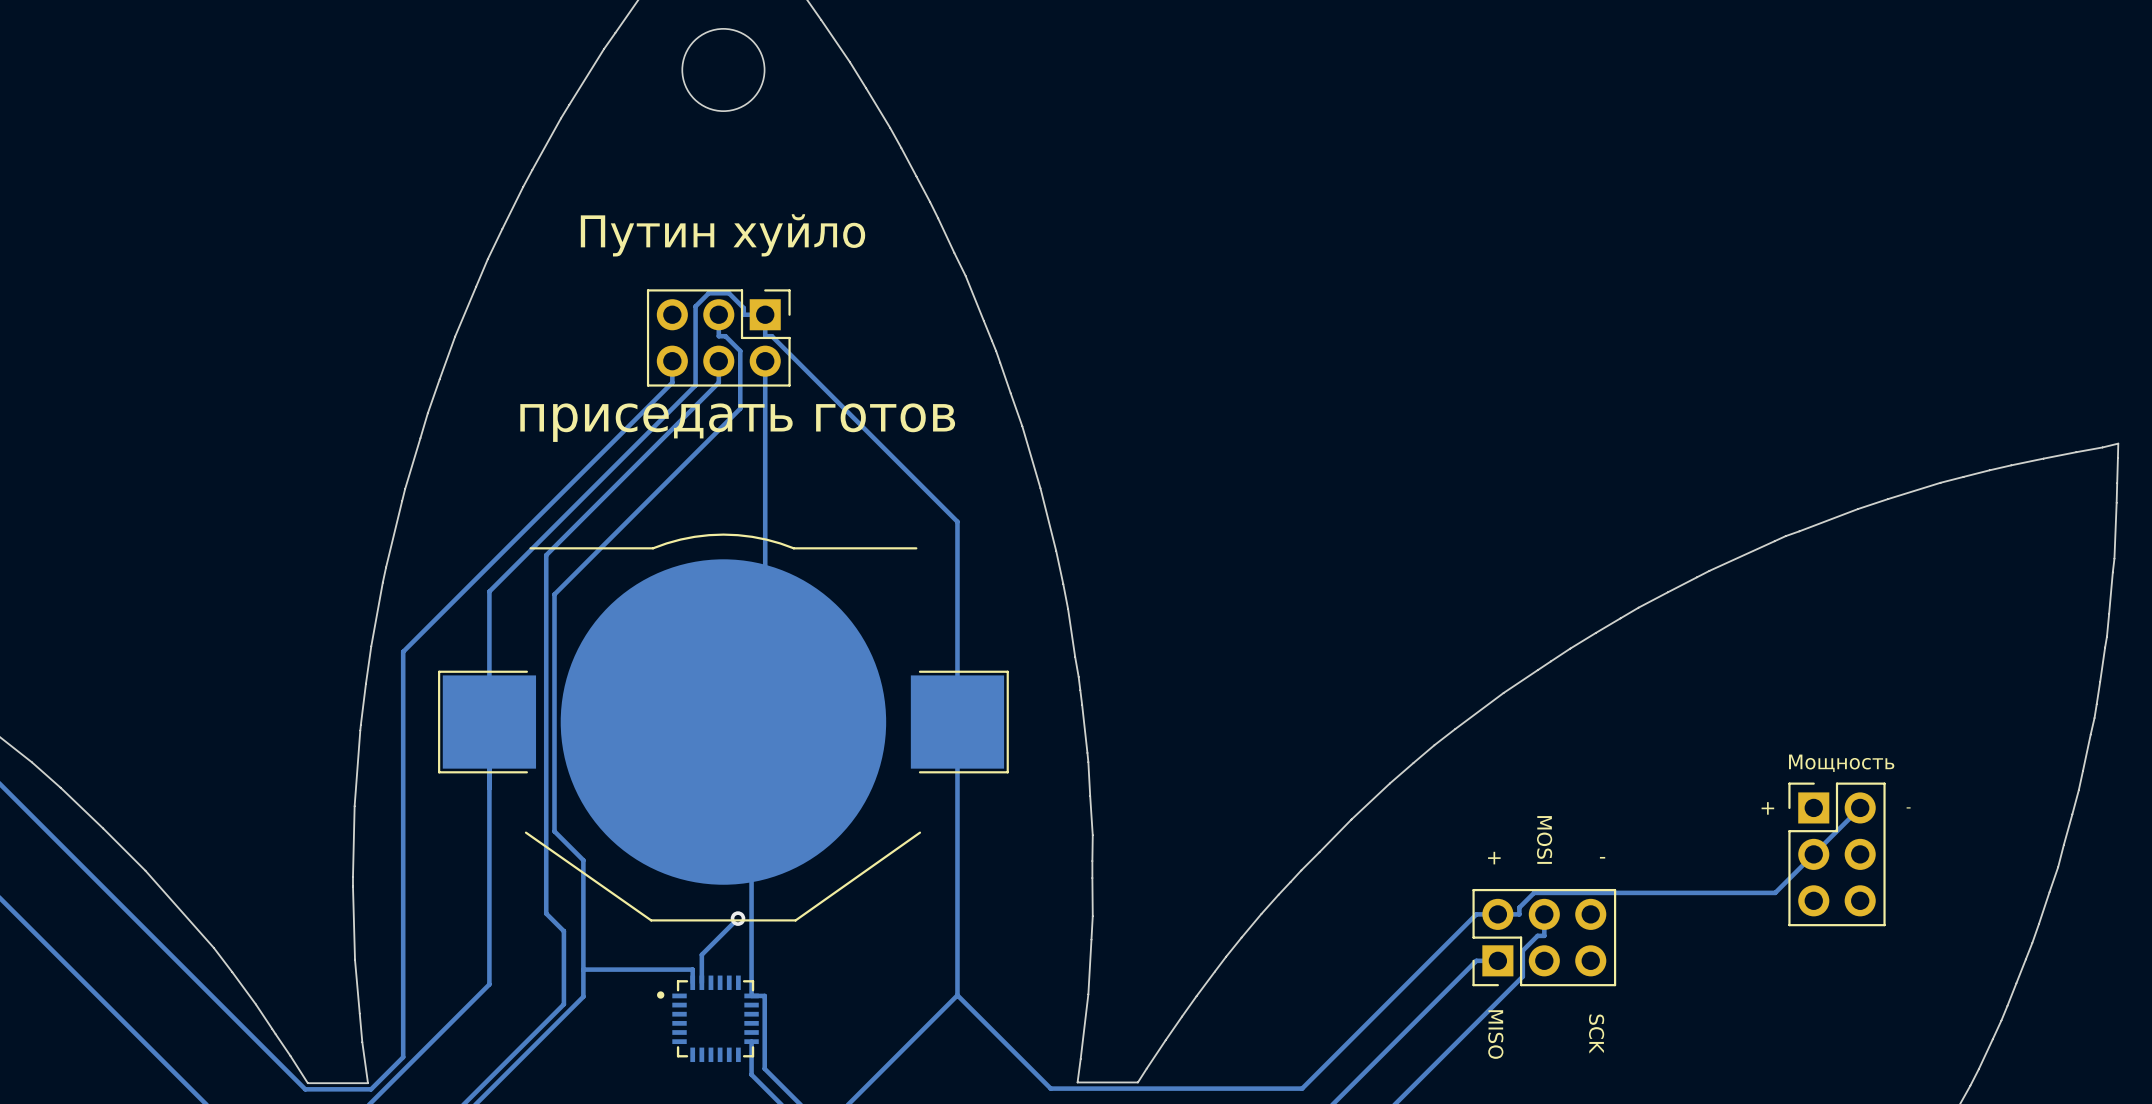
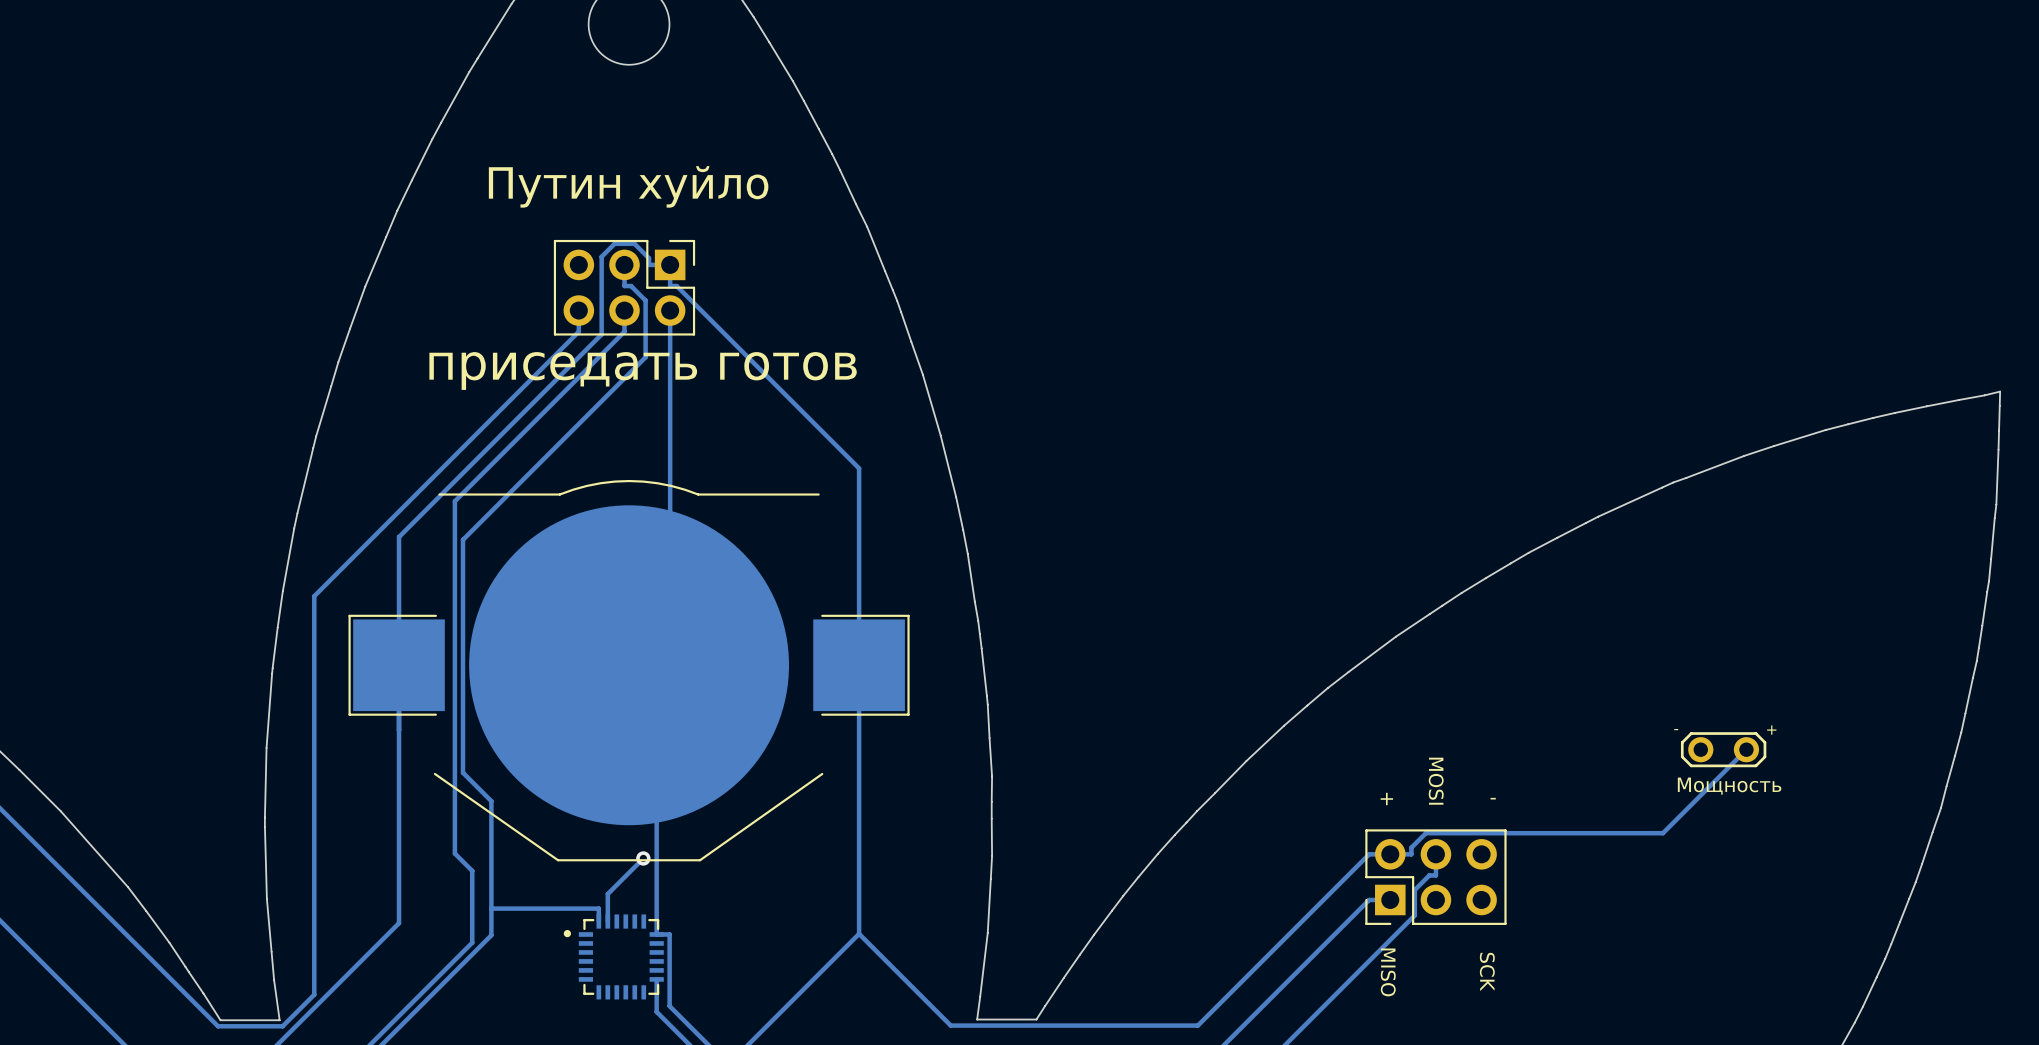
text position: Мощность (1841, 763) -> Мощность (1729, 786)
part: none -> (1723, 749)
text position: - (1908, 807) -> - (1676, 729)
text position: + (1767, 808) -> + (1771, 730)
part: (1836, 854) -> none

